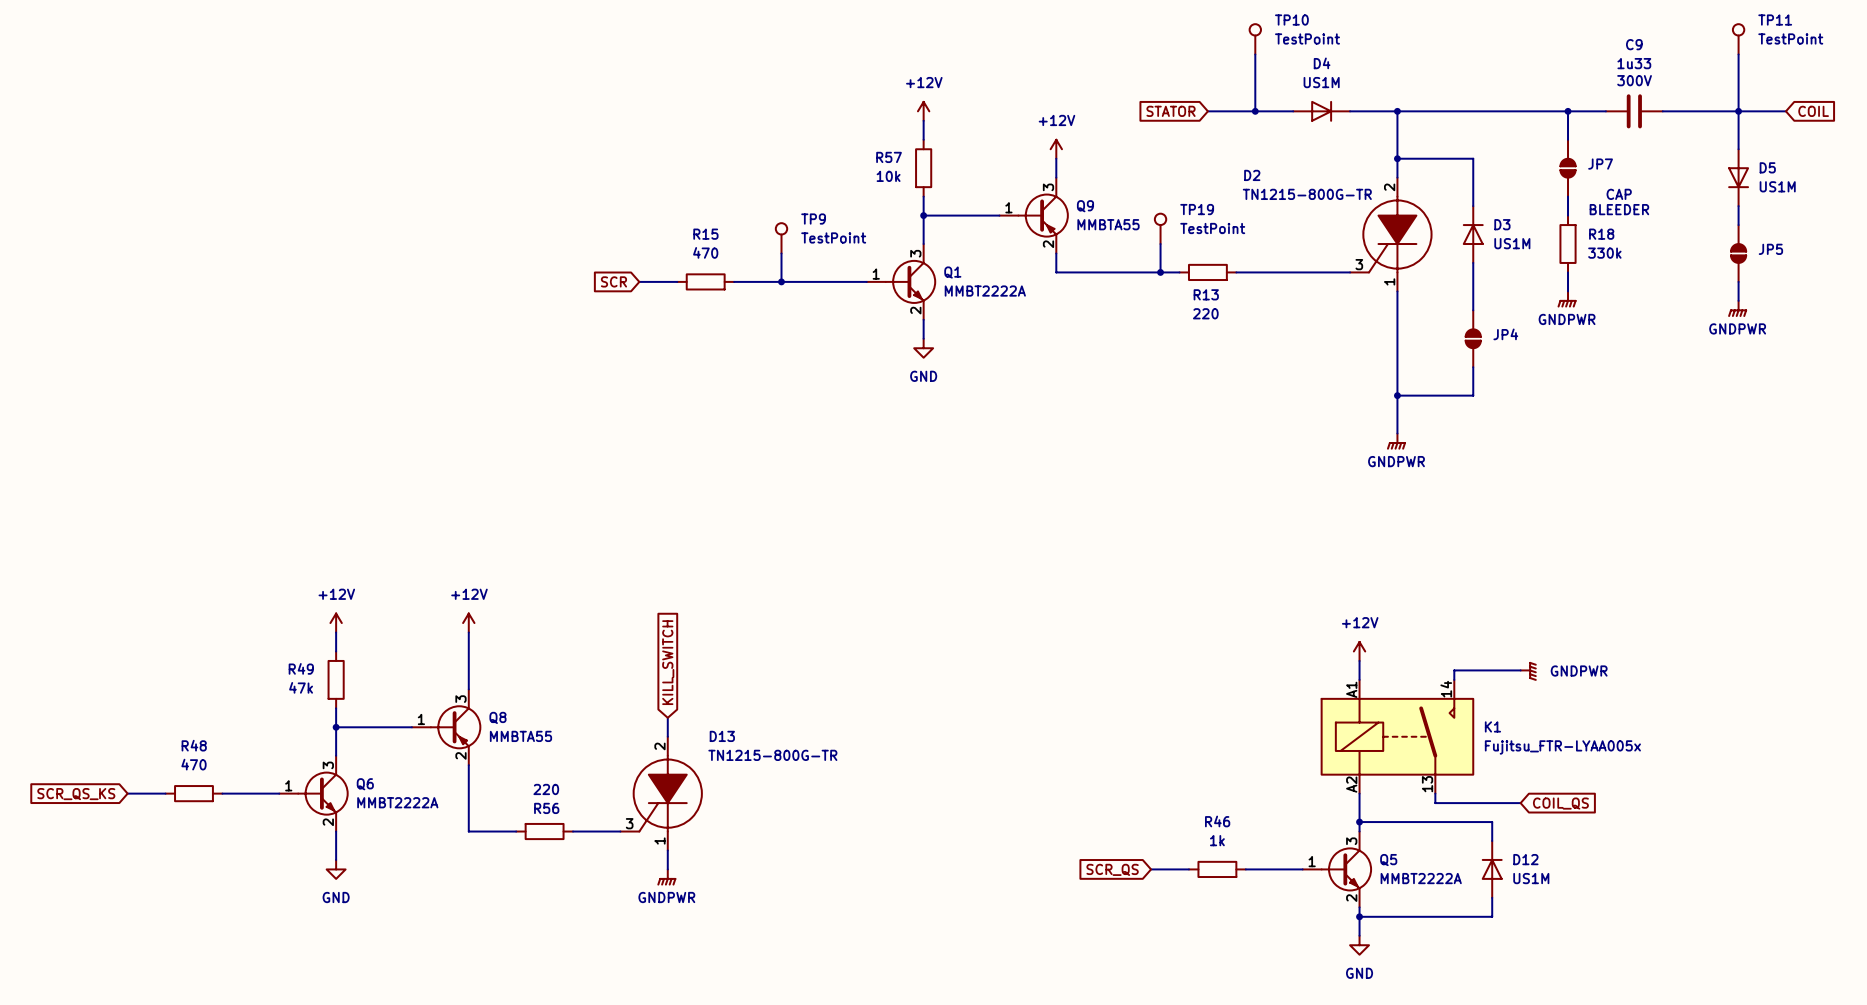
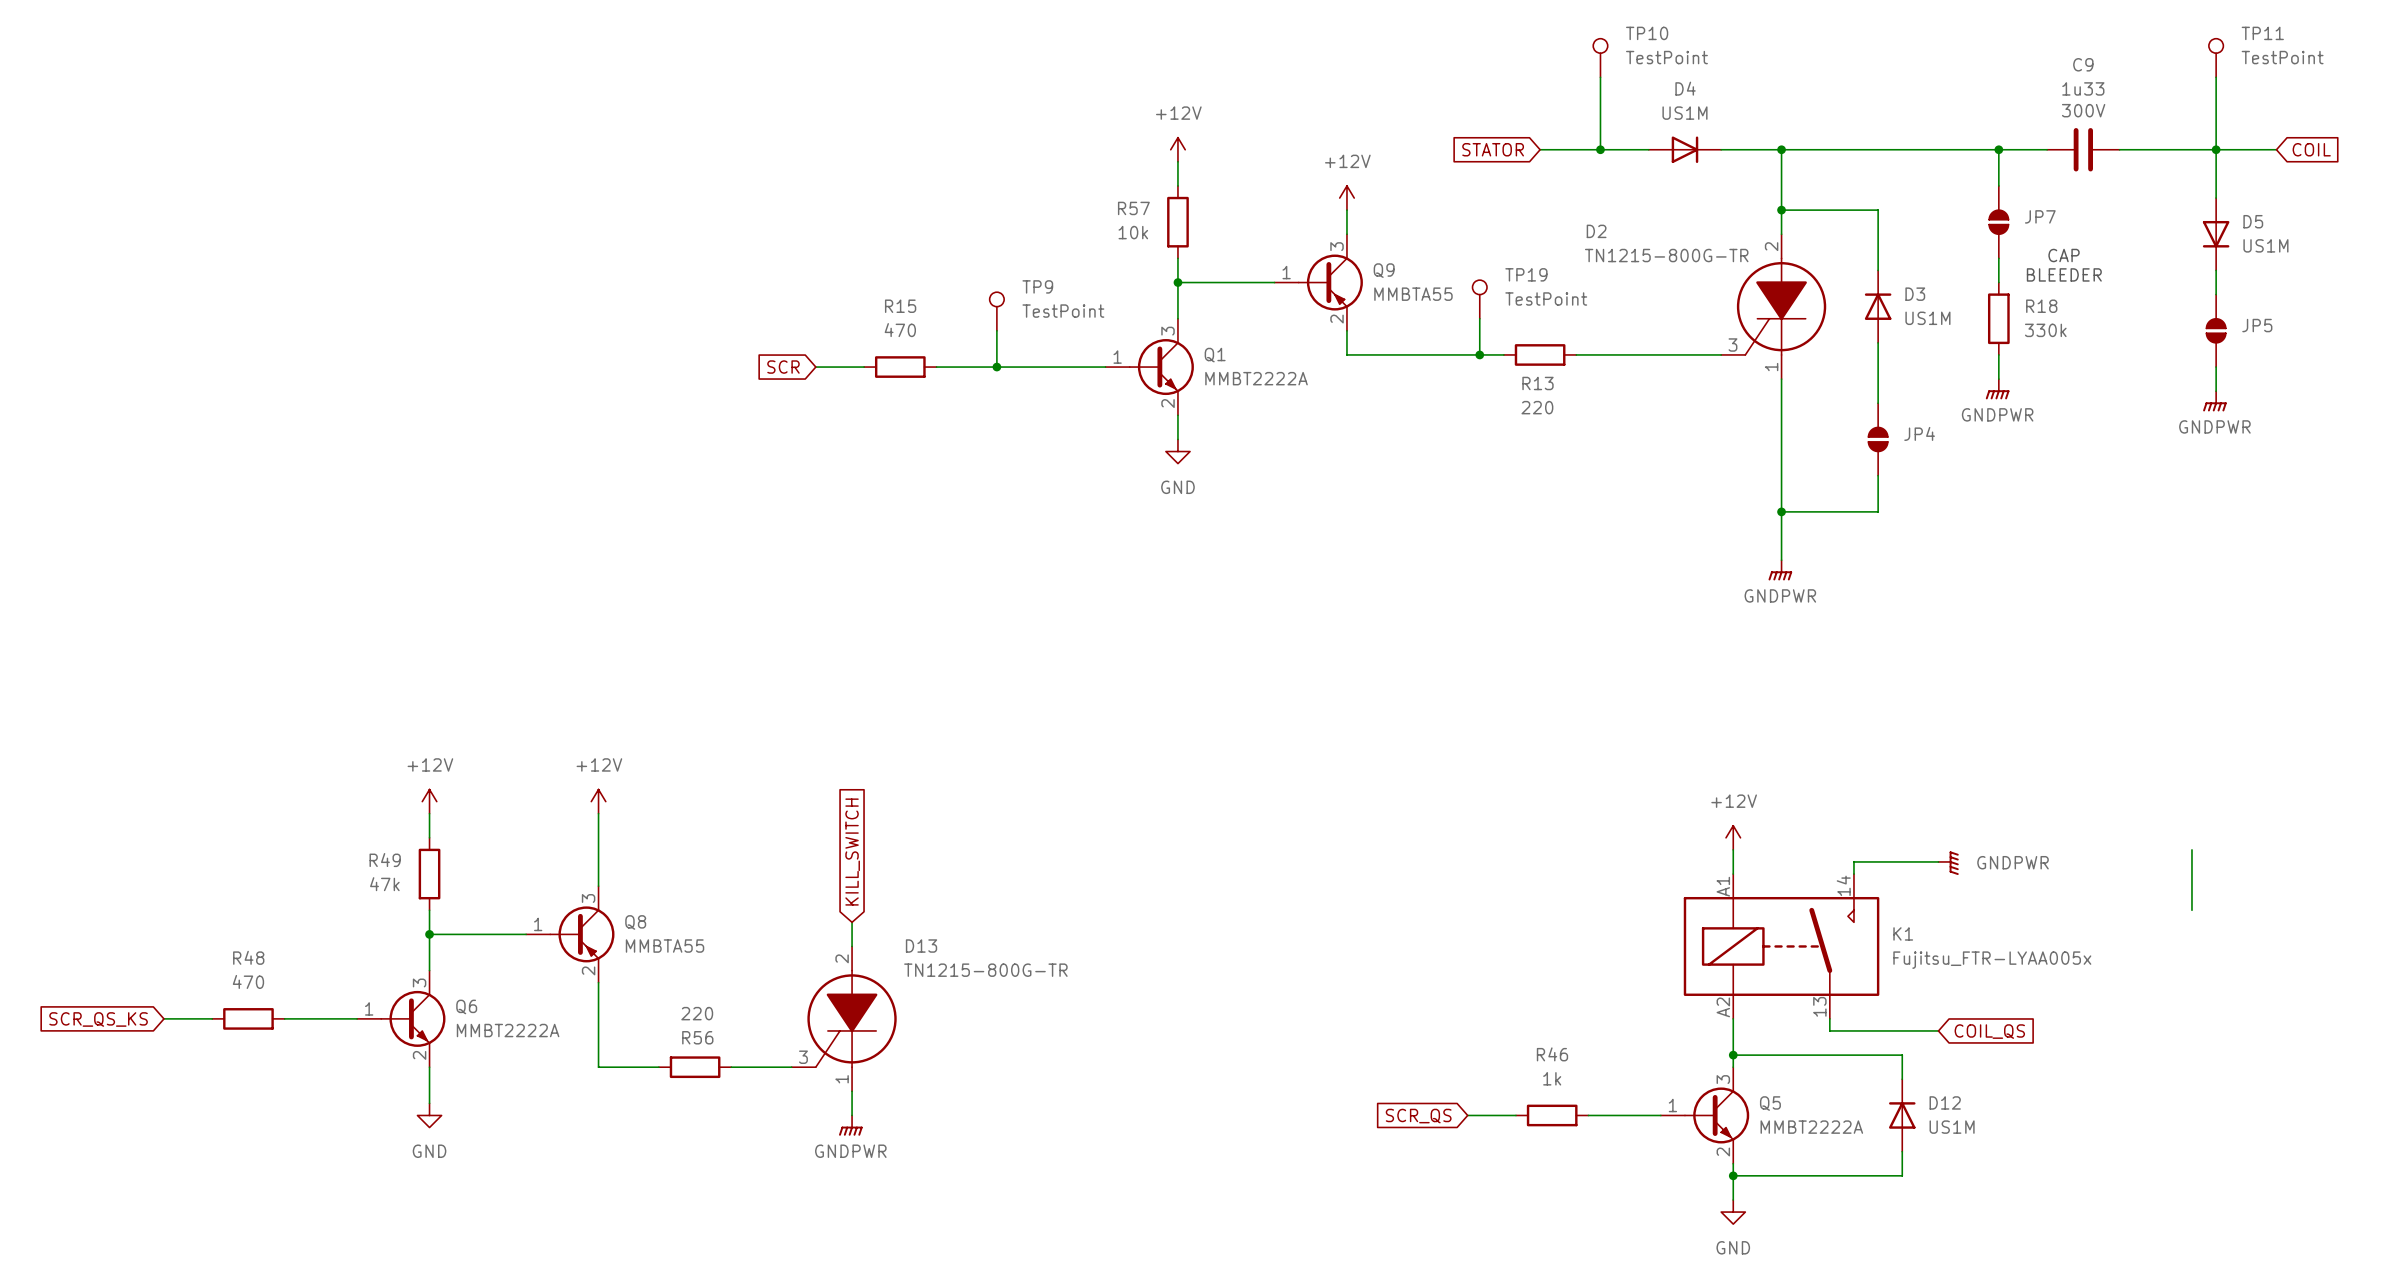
wire: none -> (2191, 849) (2191, 910)

